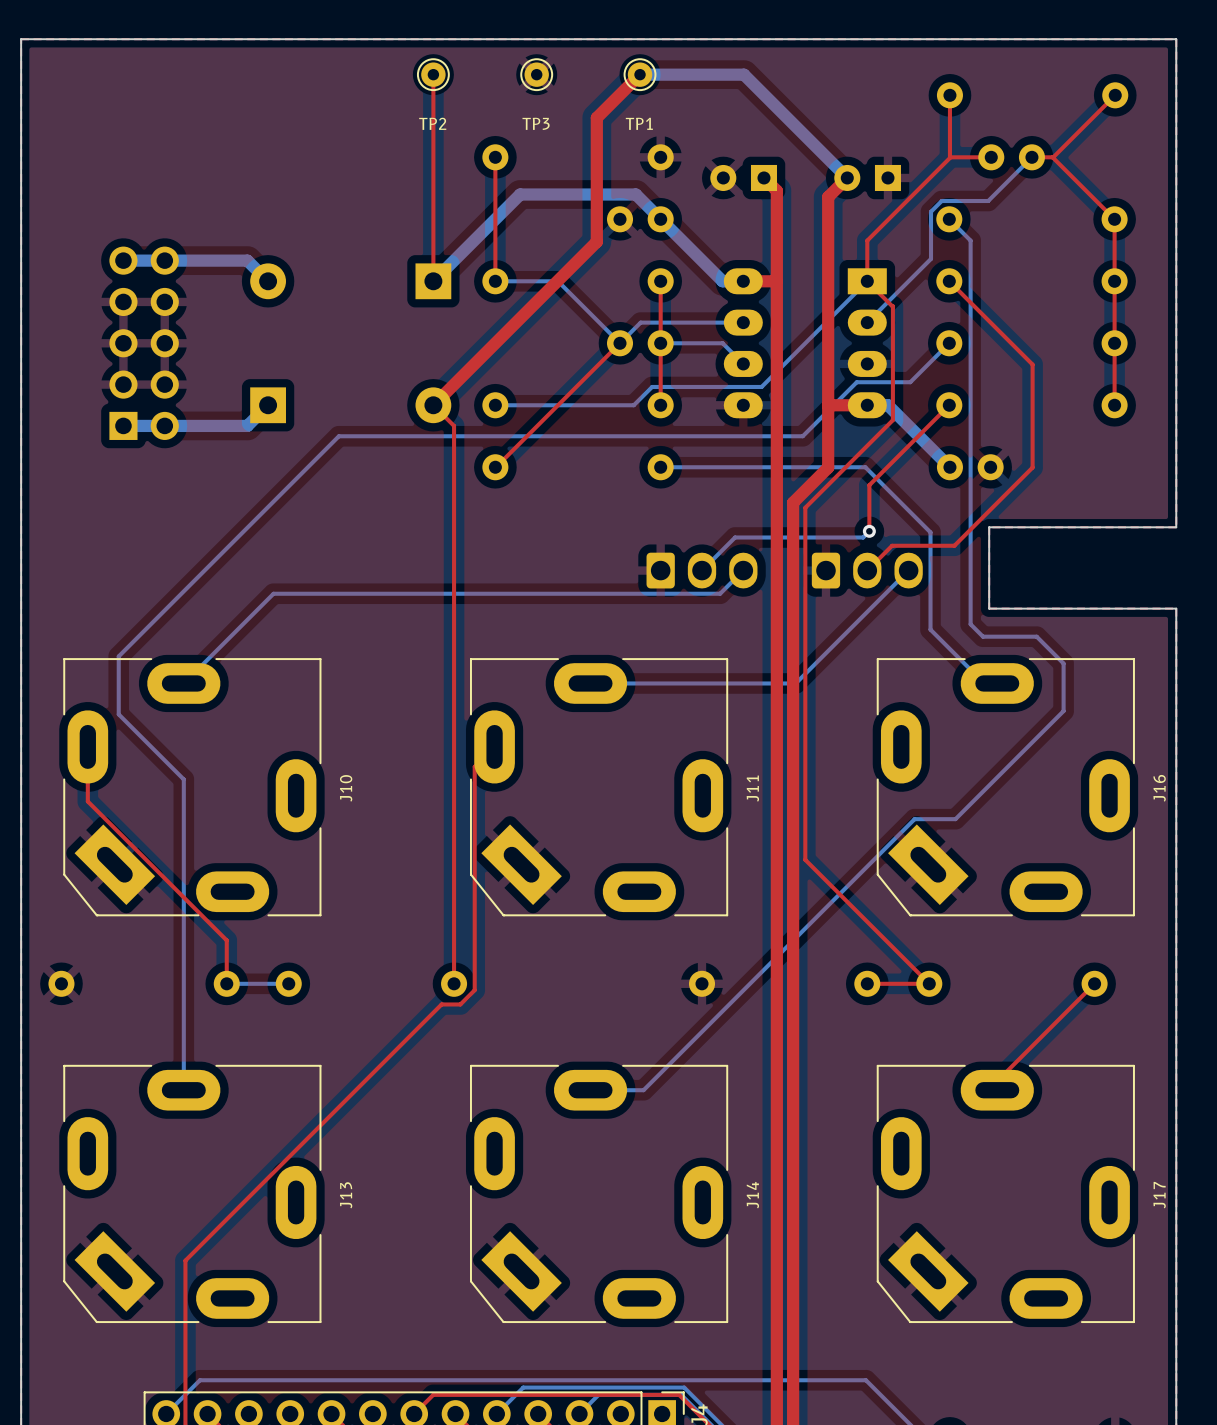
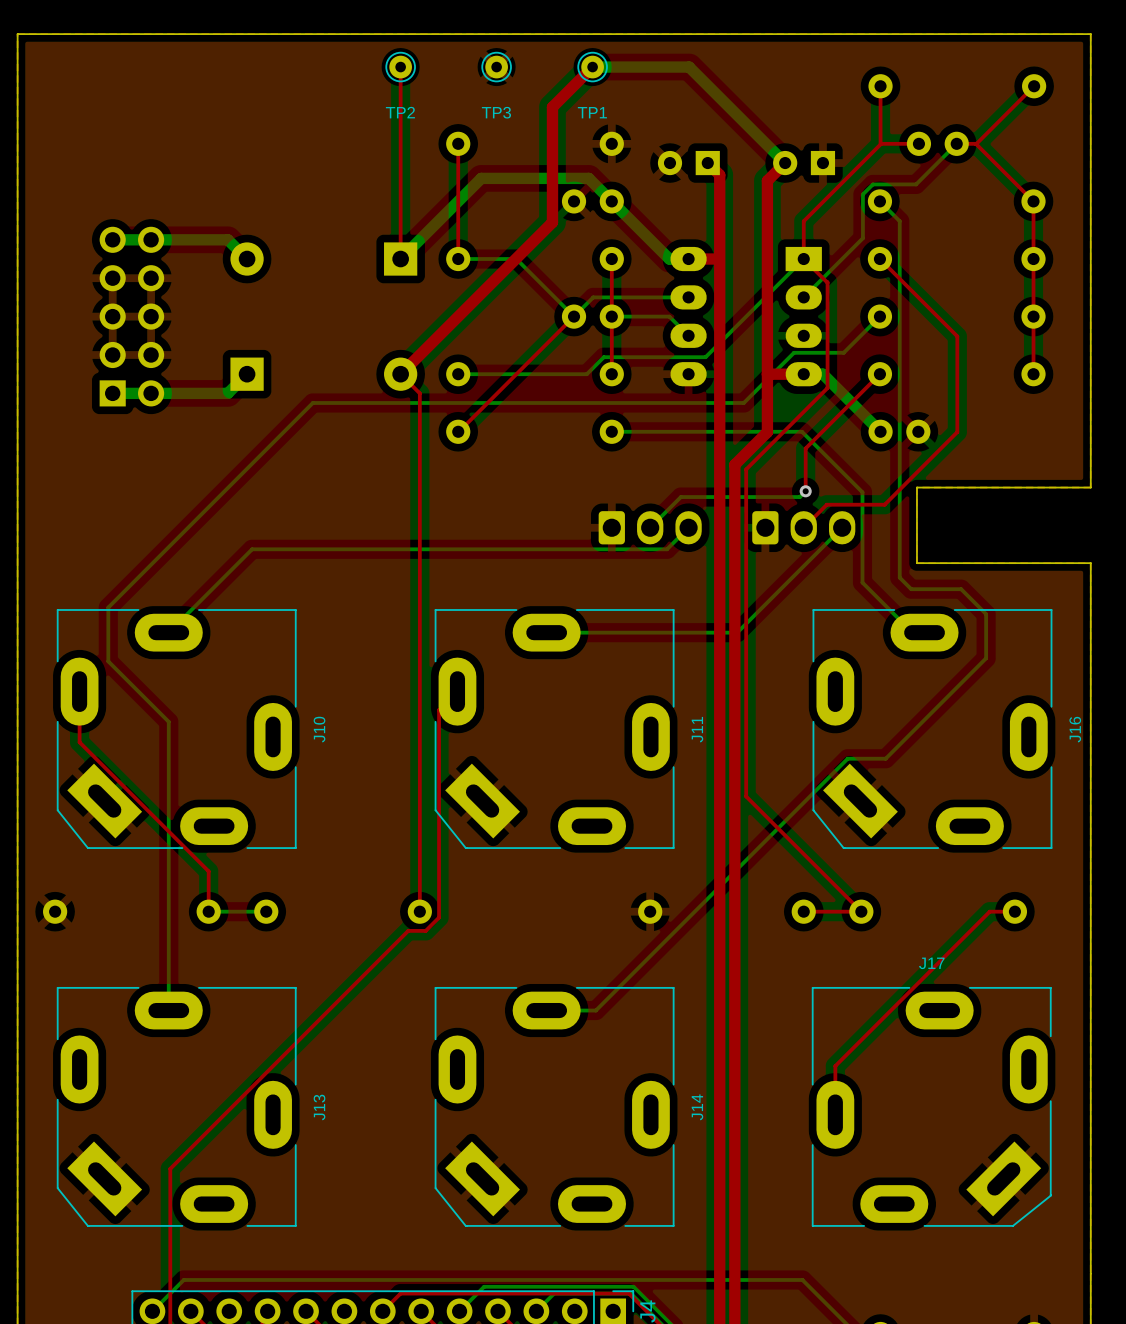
top track: (1094, 983) (997, 1081) (997, 1090) -> (1014, 911) (989, 911) (835, 1066) (835, 1114)
J17 rotation: 0° (1005, 1193) -> 90° counterclockwise (931, 1106)

